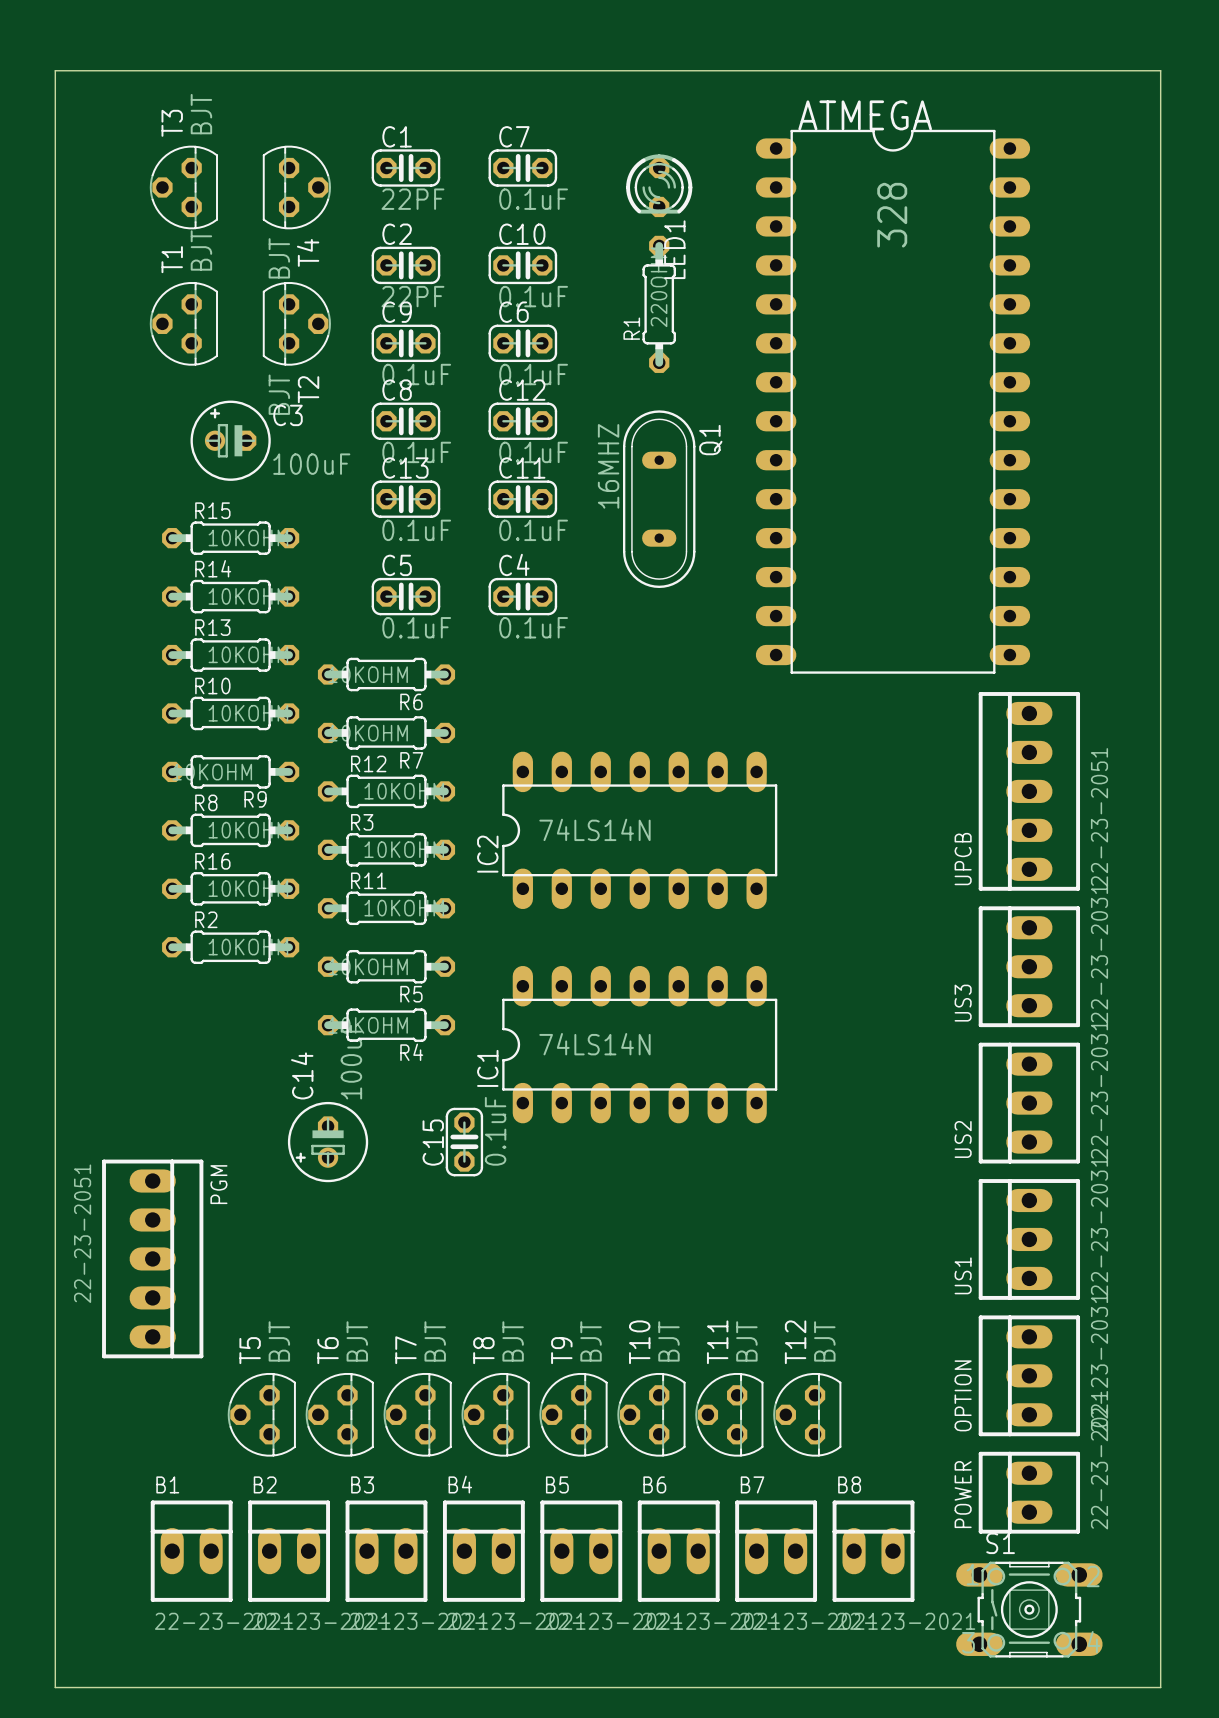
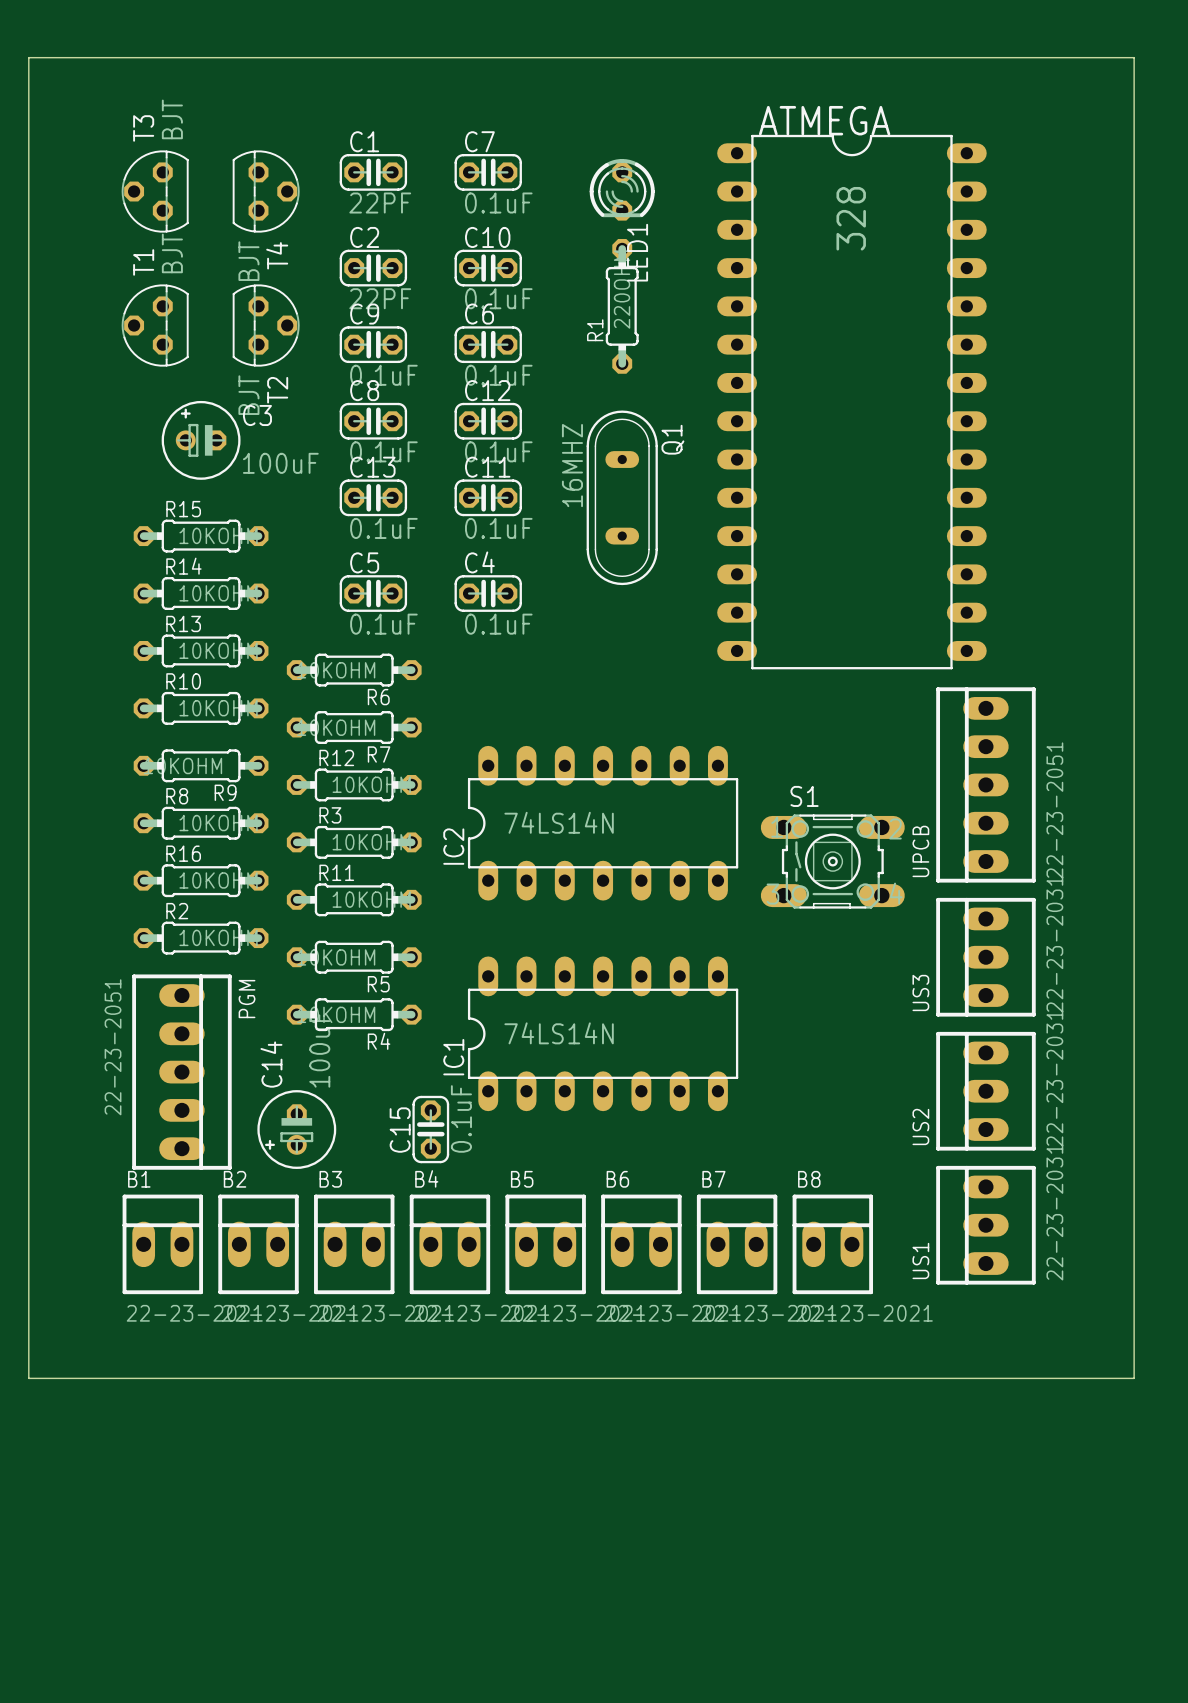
board edge: (55, 70) (1160, 70) (1160, 1687) (55, 1687) (55, 1395) -> (28, 76) (28, 57) (1134, 57) (1134, 1378) (28, 1378)
PGM position: (152, 1258) -> (181, 1072)
OPTION: 22-23-2031 (1029, 1375) -> none
T5: BJT (261, 1414) -> none
T6: BJT (339, 1414) -> none
T7: BJT (417, 1414) -> none
T8: BJT (495, 1414) -> none
T9: BJT (573, 1414) -> none
T10: BJT (651, 1414) -> none
T11: BJT (729, 1414) -> none
T12: BJT (807, 1414) -> none
POWER: 22-23-2021 (1029, 1492) -> none
B1 position: (191, 1551) -> (162, 1244)
B2 position: (289, 1551) -> (258, 1244)
B3 position: (386, 1551) -> (354, 1244)
B4 position: (483, 1551) -> (449, 1244)
B5 position: (581, 1551) -> (545, 1244)
B6 position: (678, 1551) -> (641, 1244)
B7 position: (776, 1551) -> (737, 1244)
B8 position: (873, 1551) -> (832, 1244)
S1 position: (1029, 1609) -> (832, 861)

